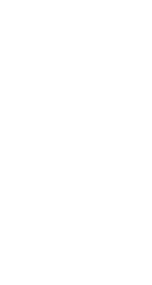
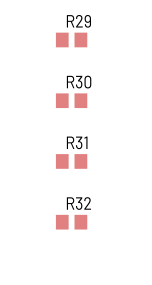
R29: none -> (71, 39)
R30: none -> (71, 100)
R31: none -> (71, 161)
R32: none -> (71, 222)

